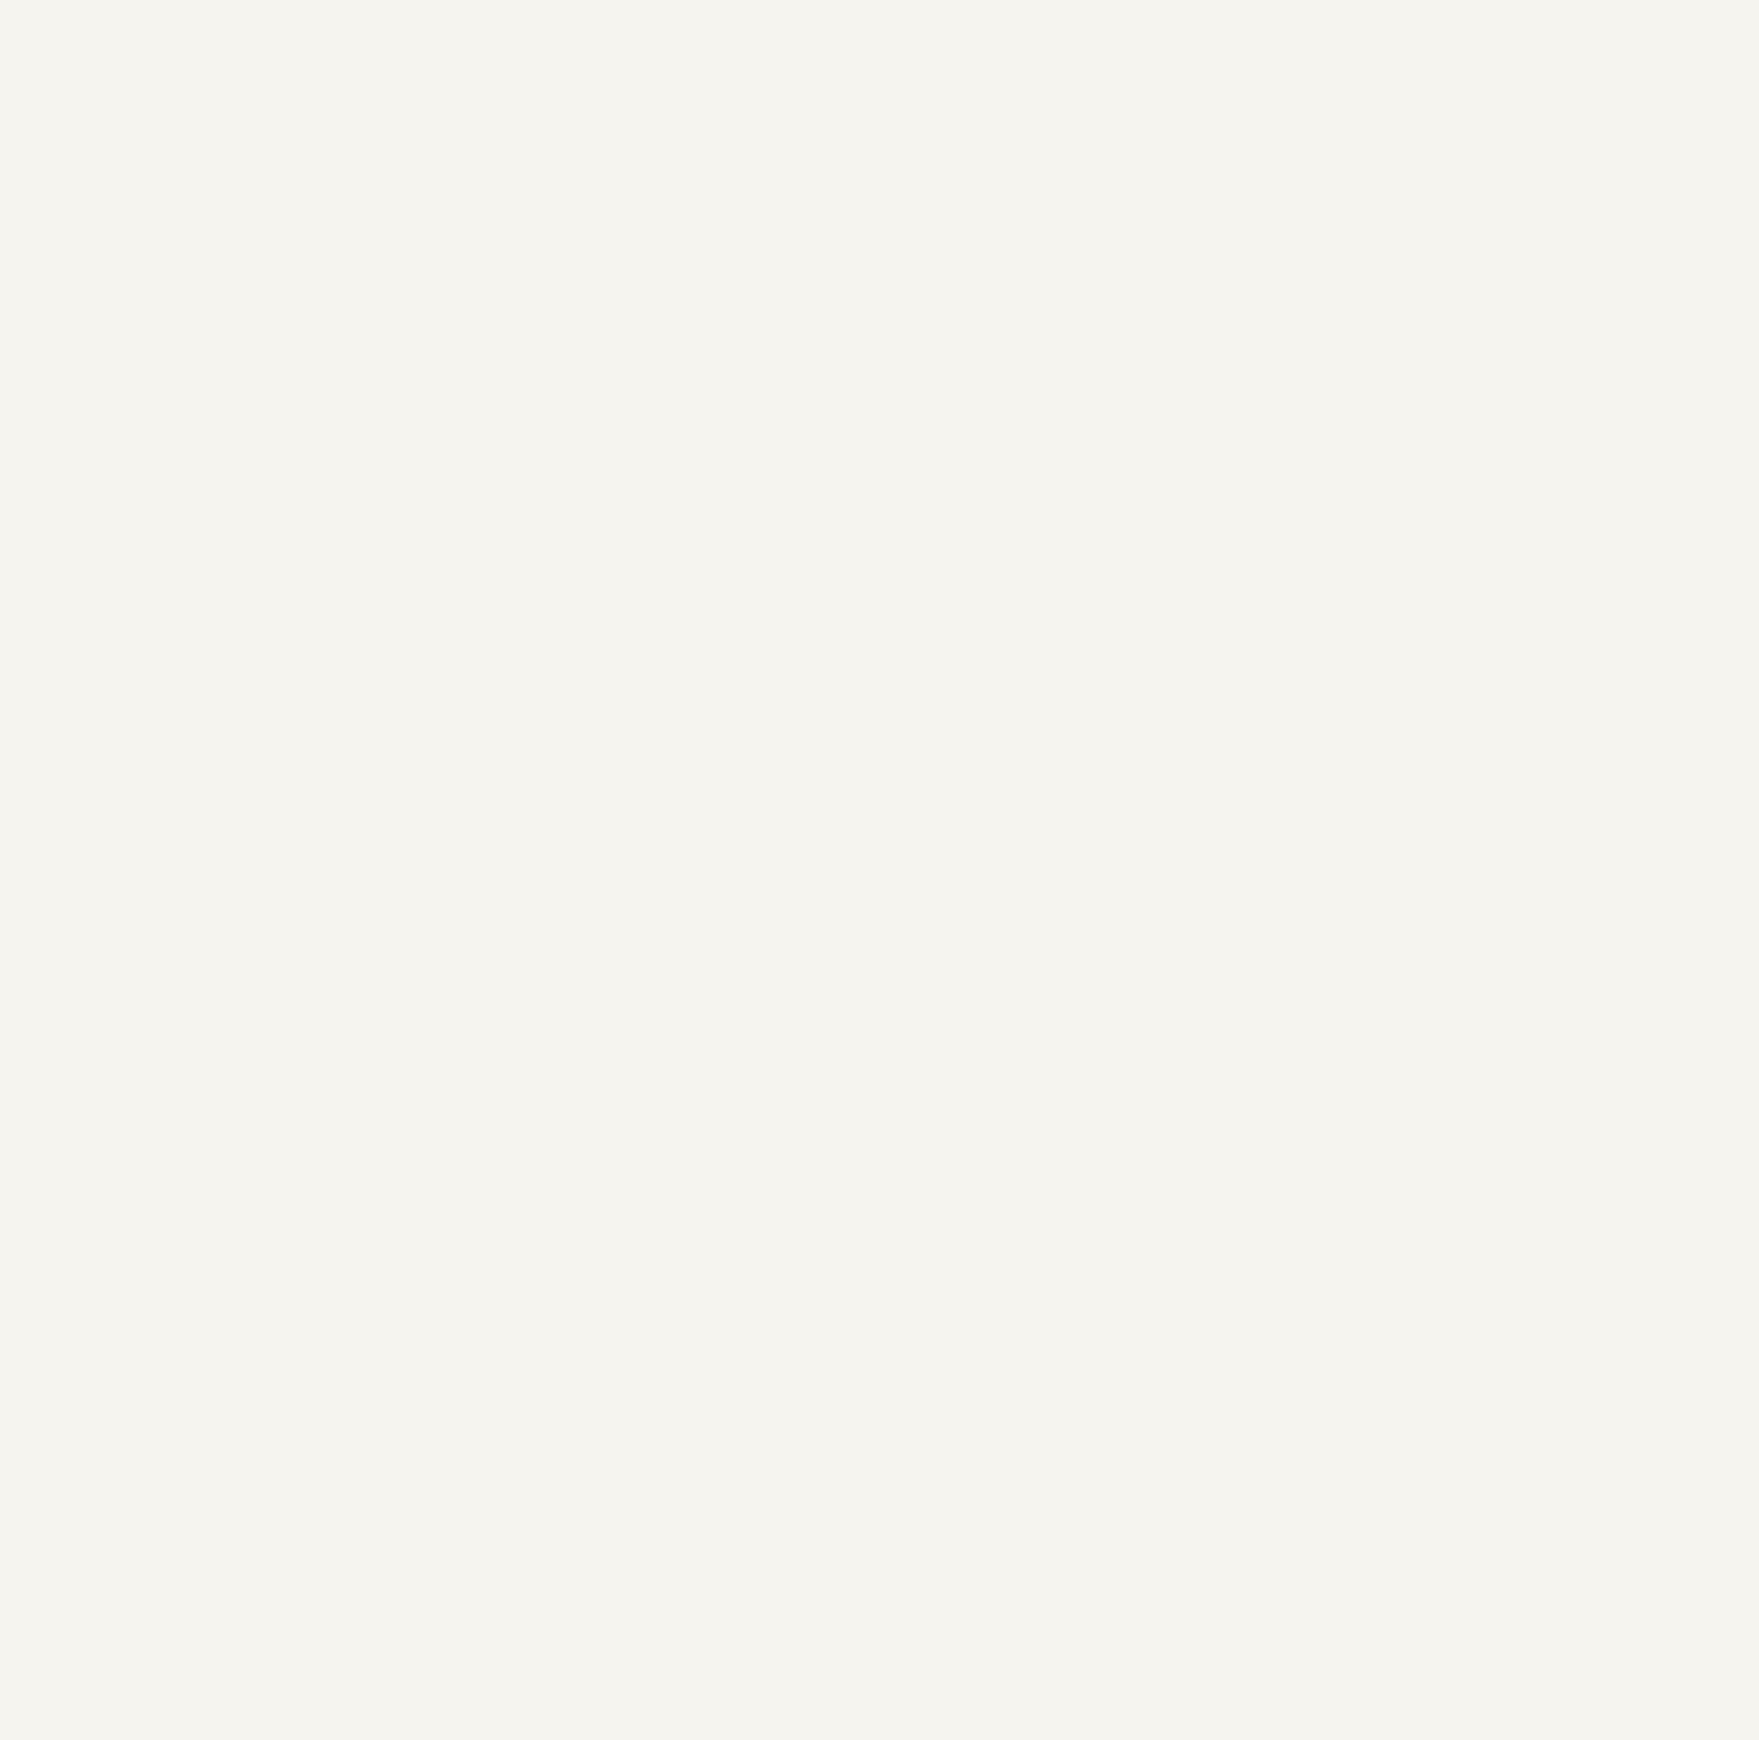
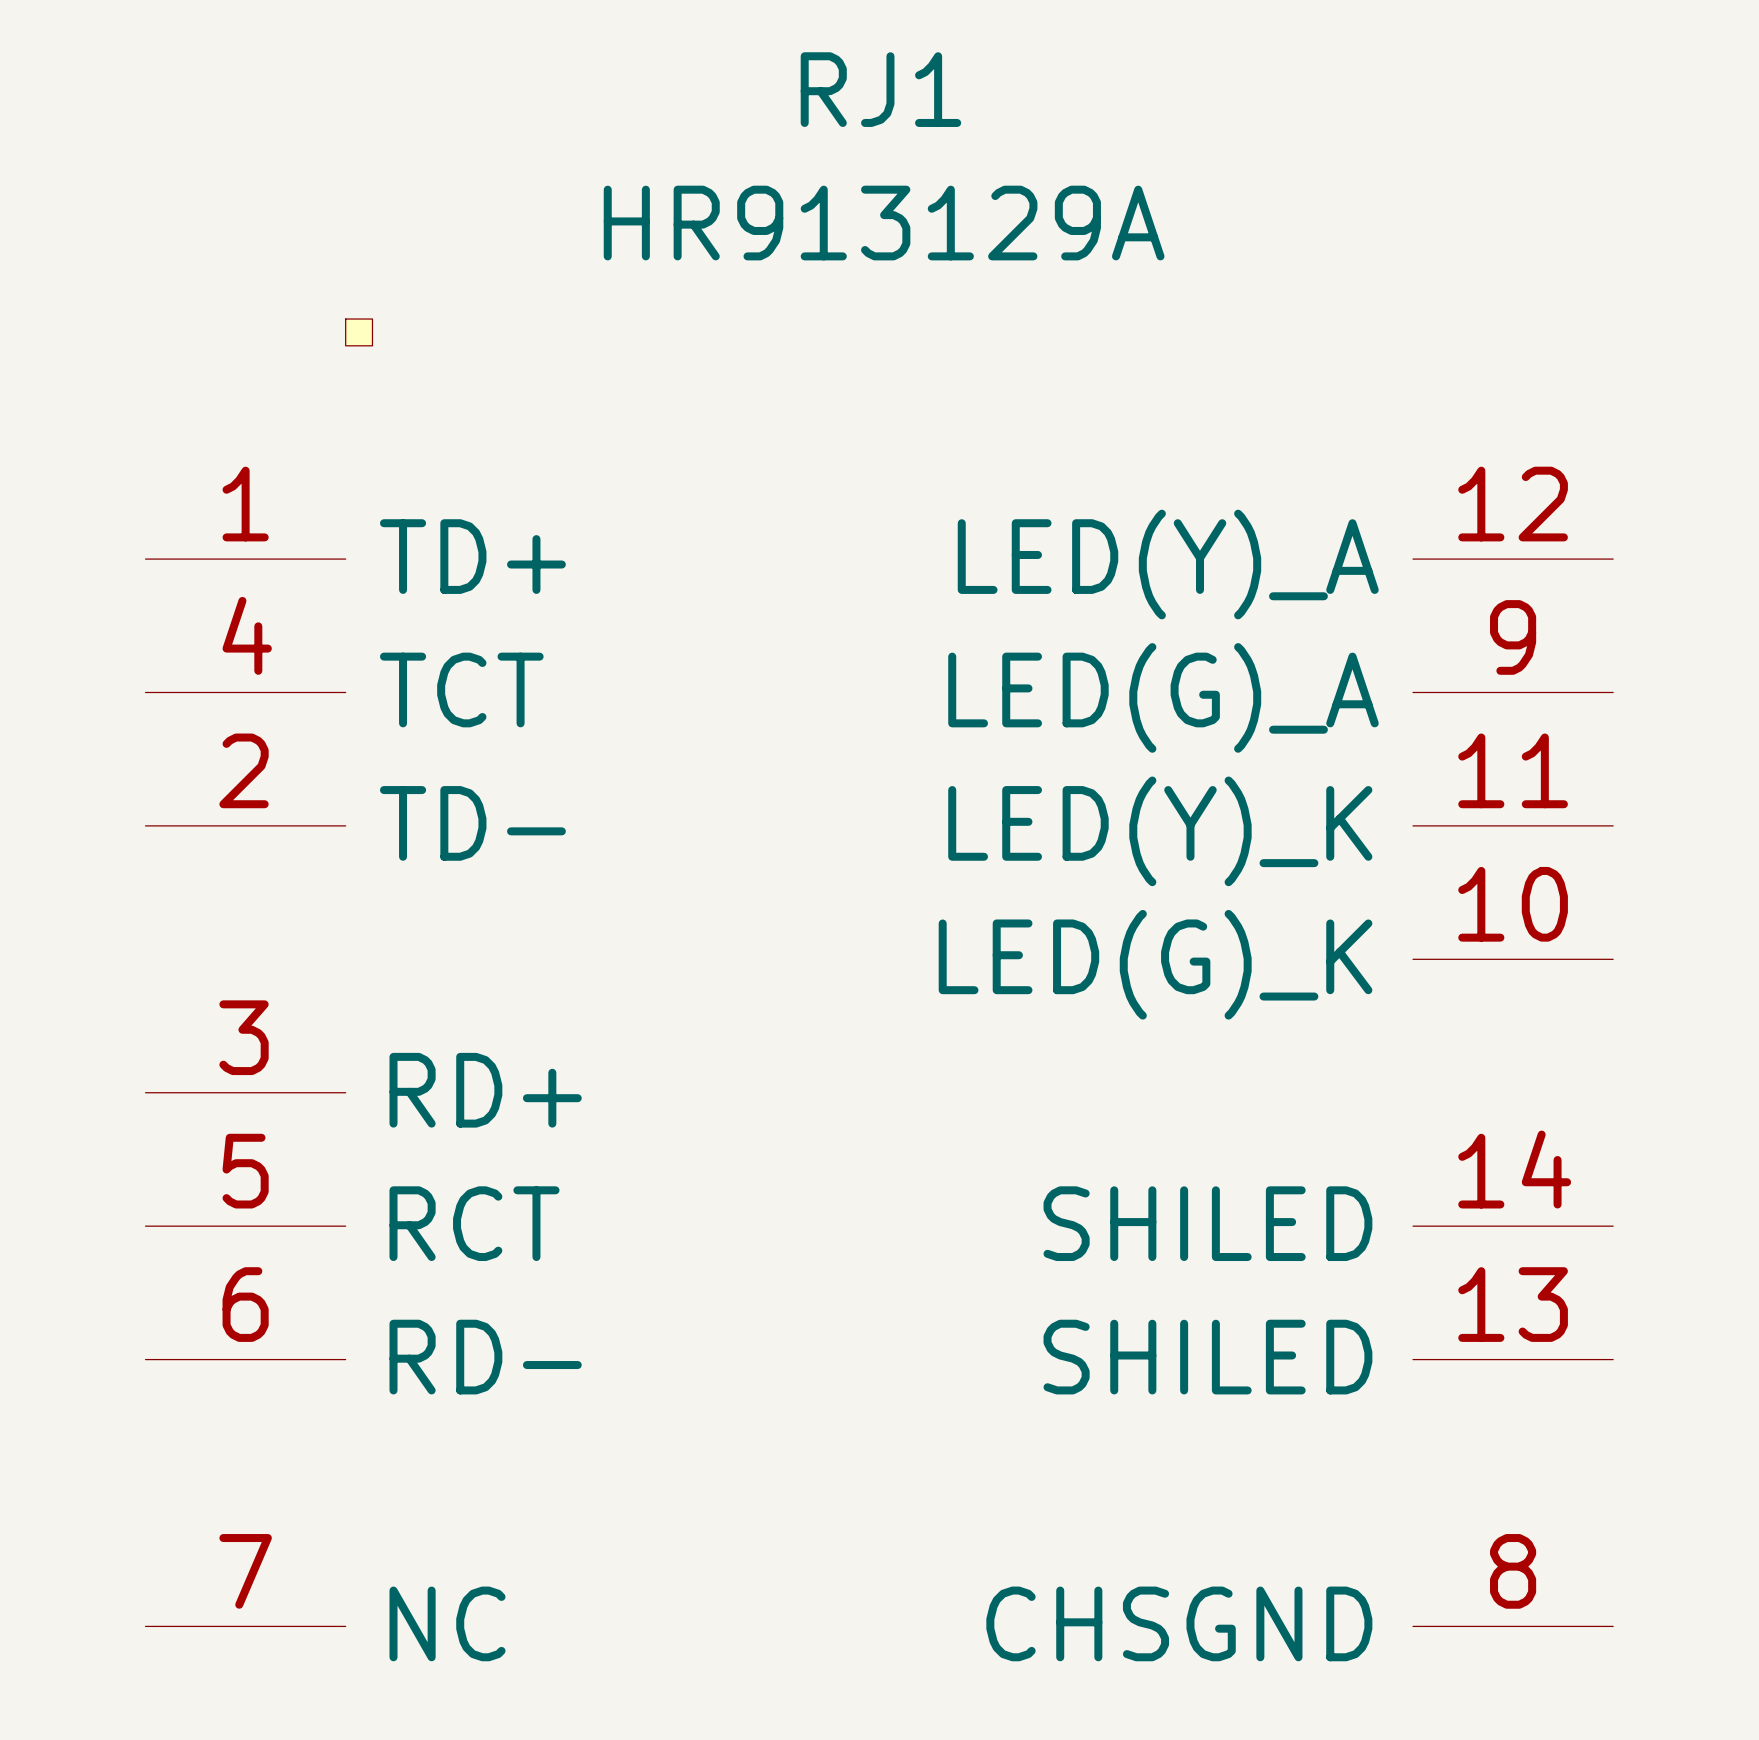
RJ1: none -> HR913129A (879, 972)

